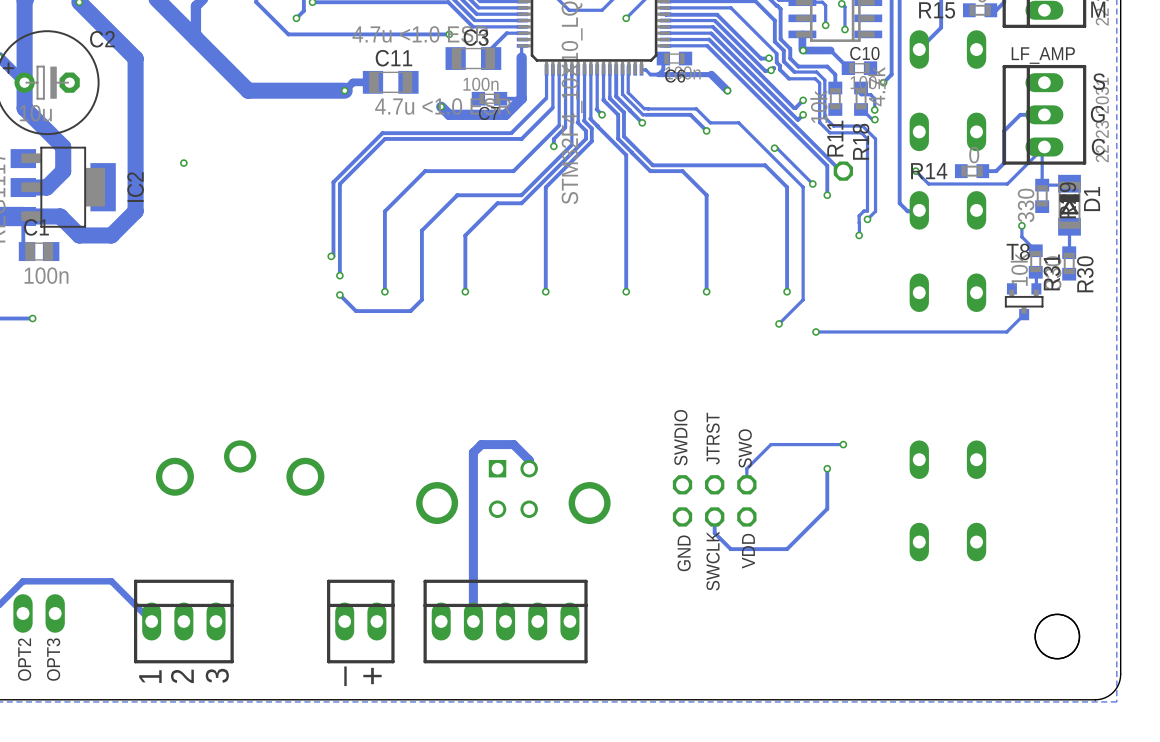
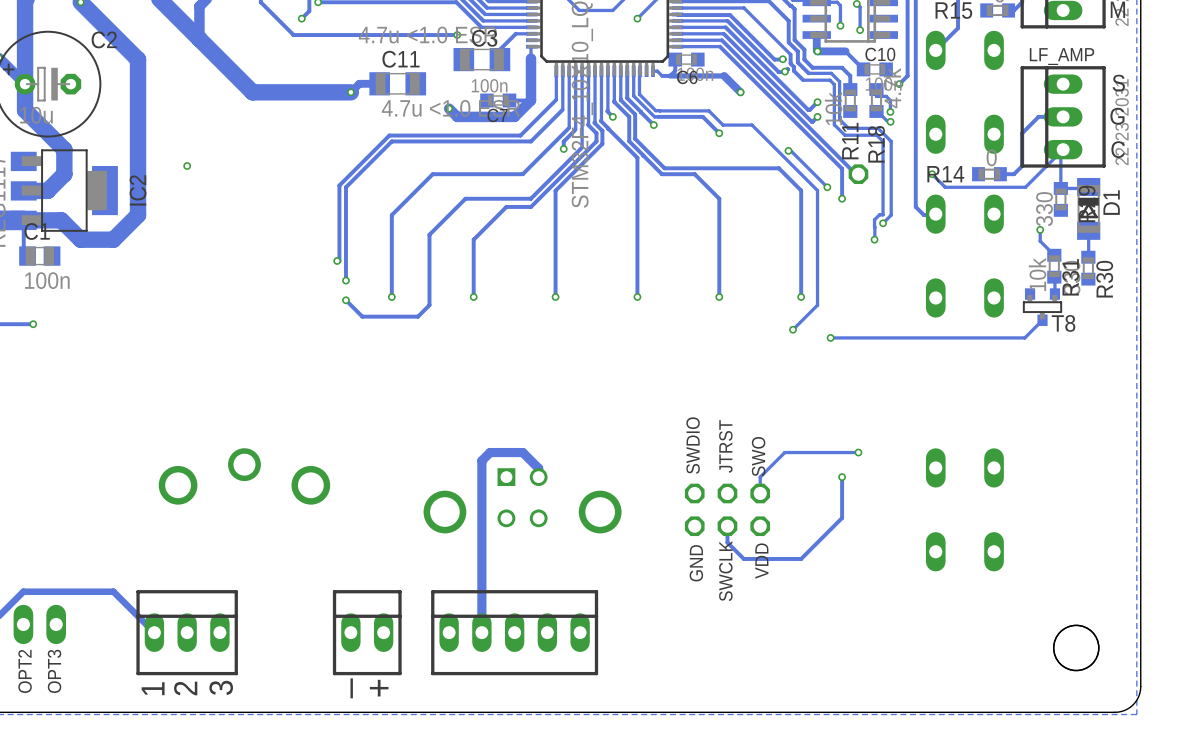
T8 name position: T8 (1018, 251) -> T8 (1063, 323)

